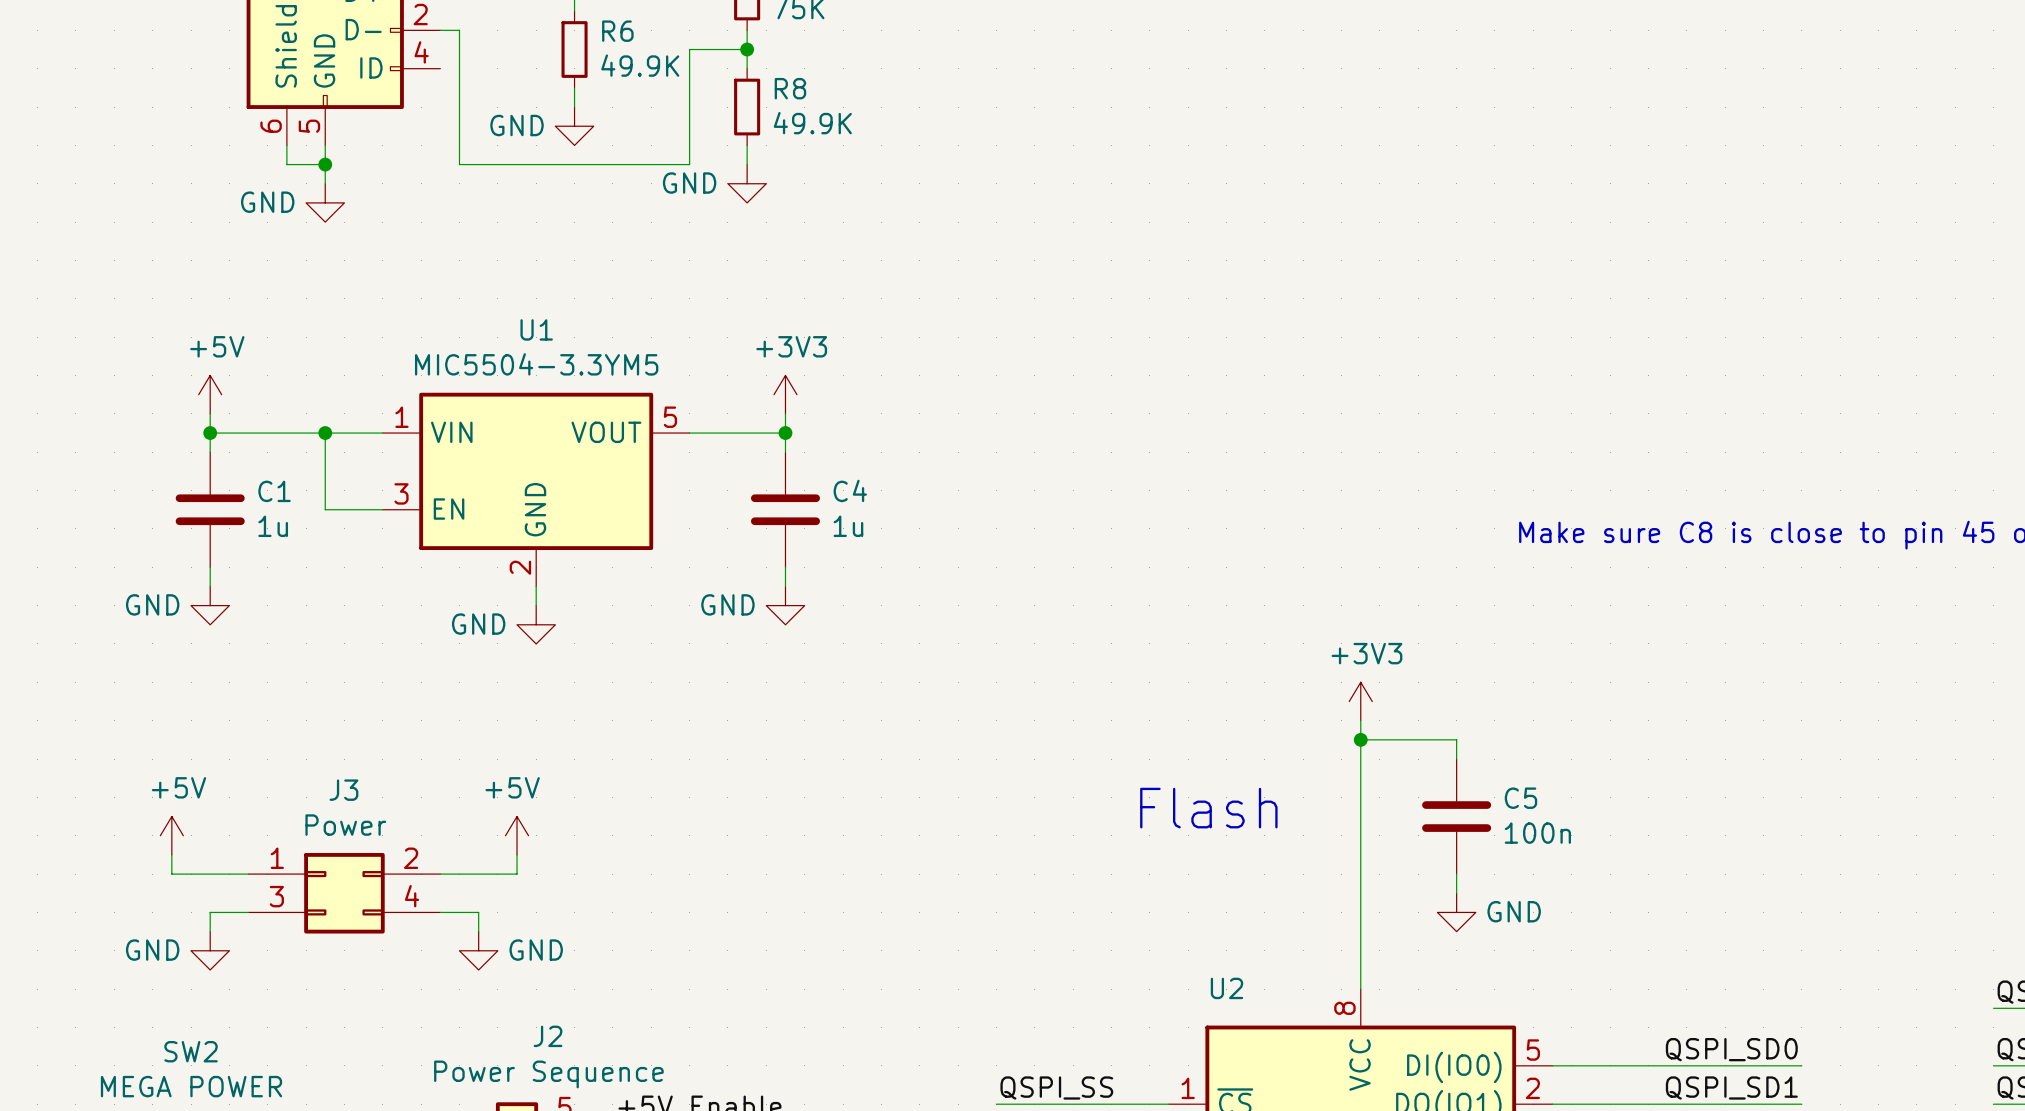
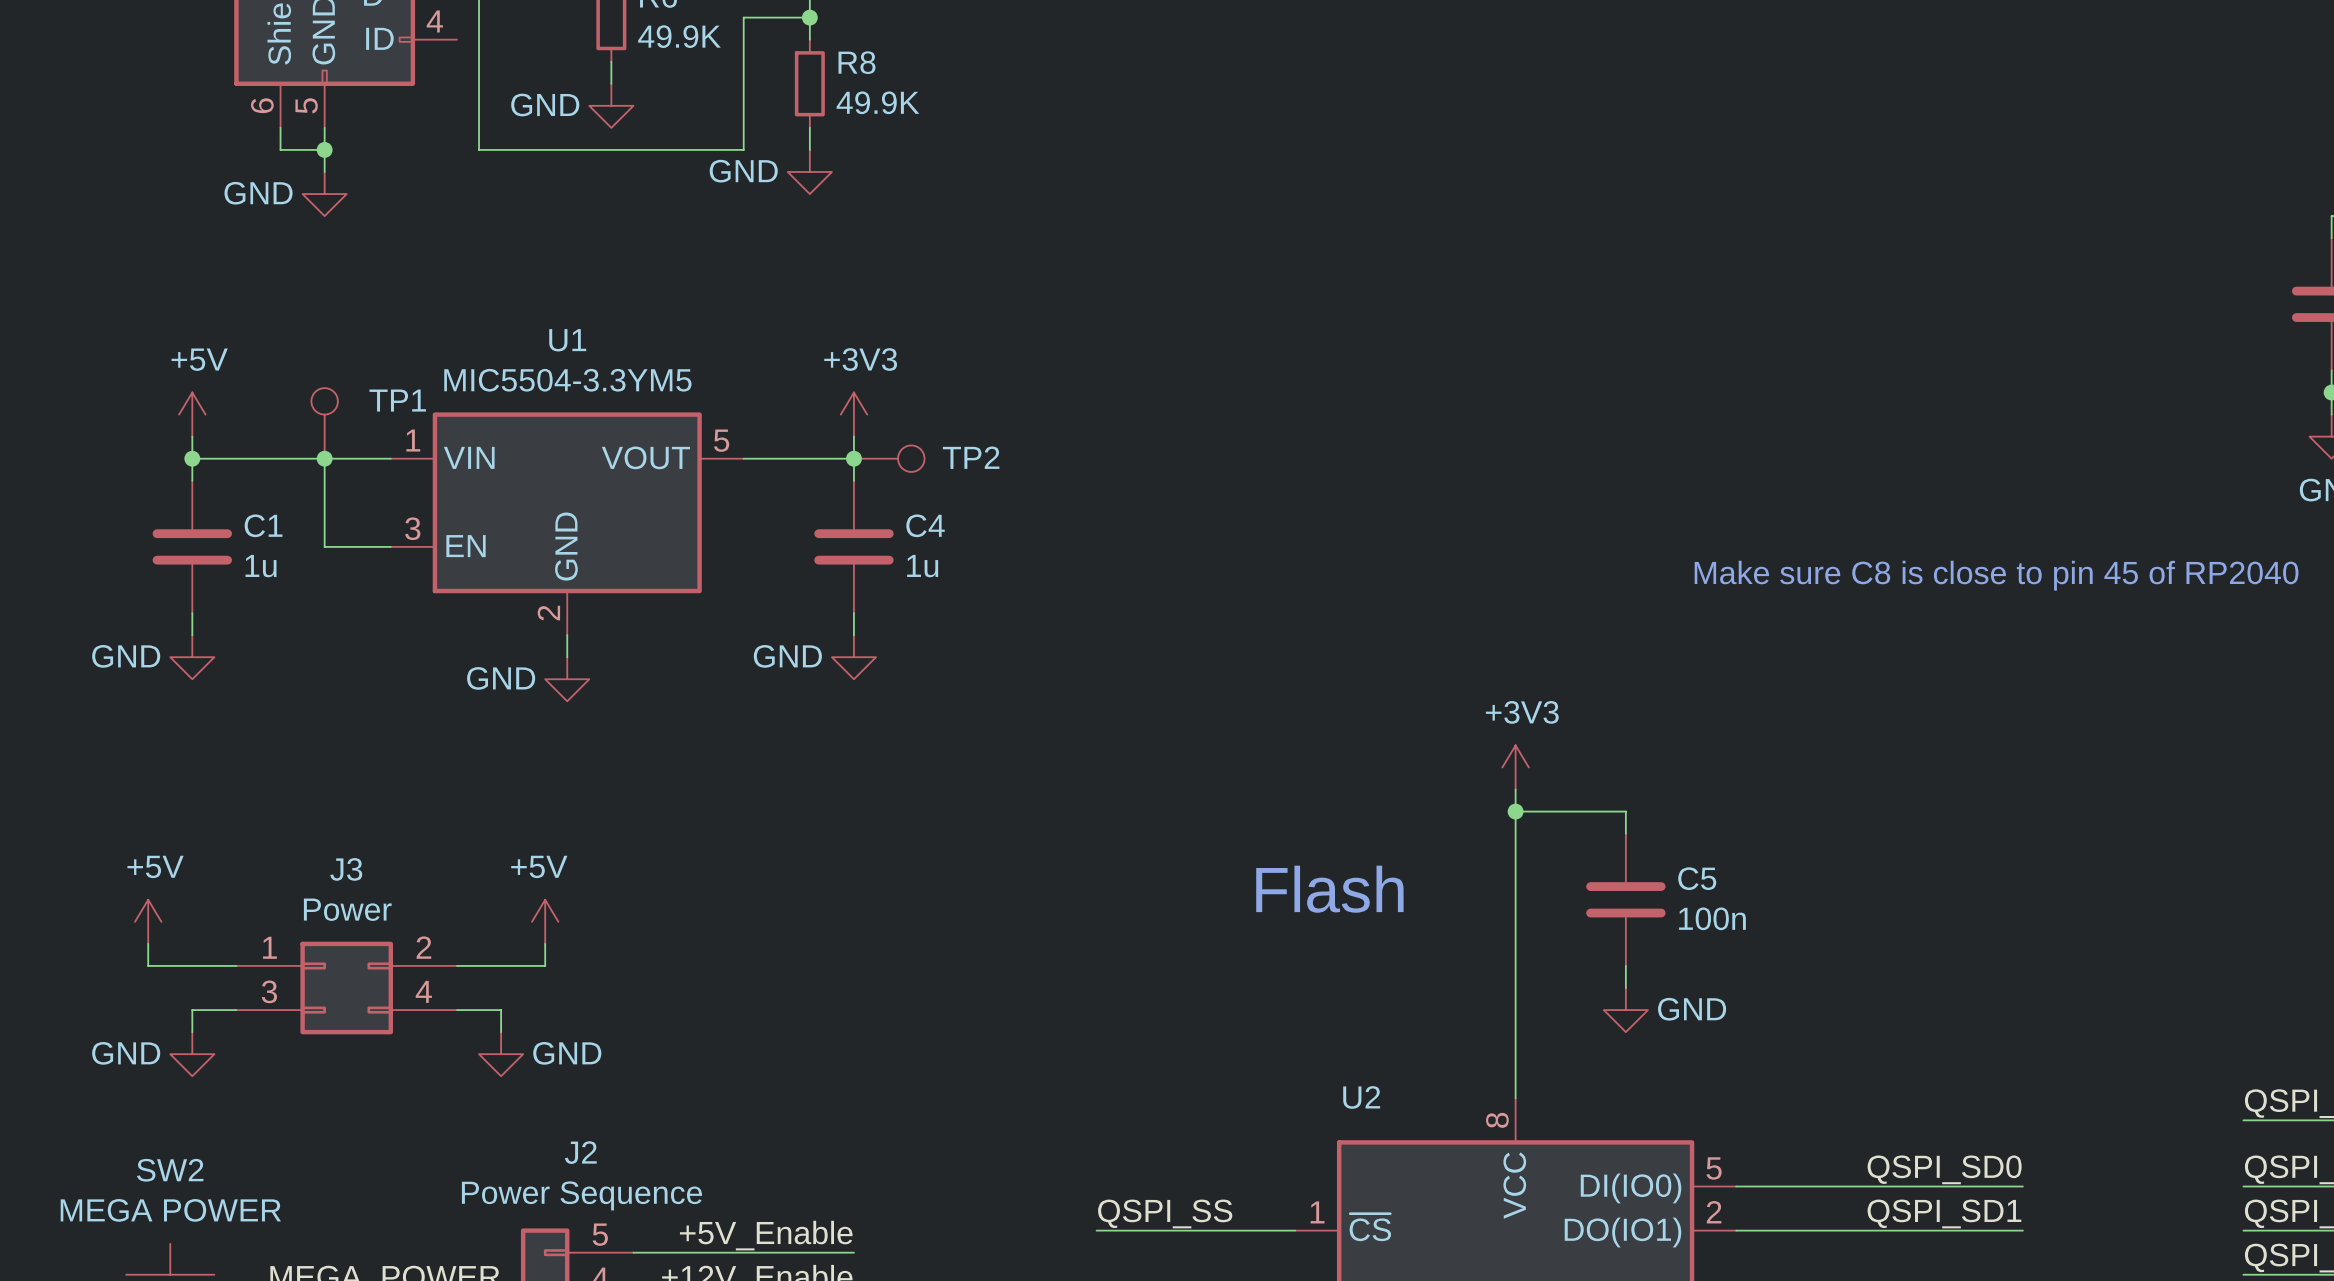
TP1: none -> (324, 423)
TP2: none -> (889, 458)

